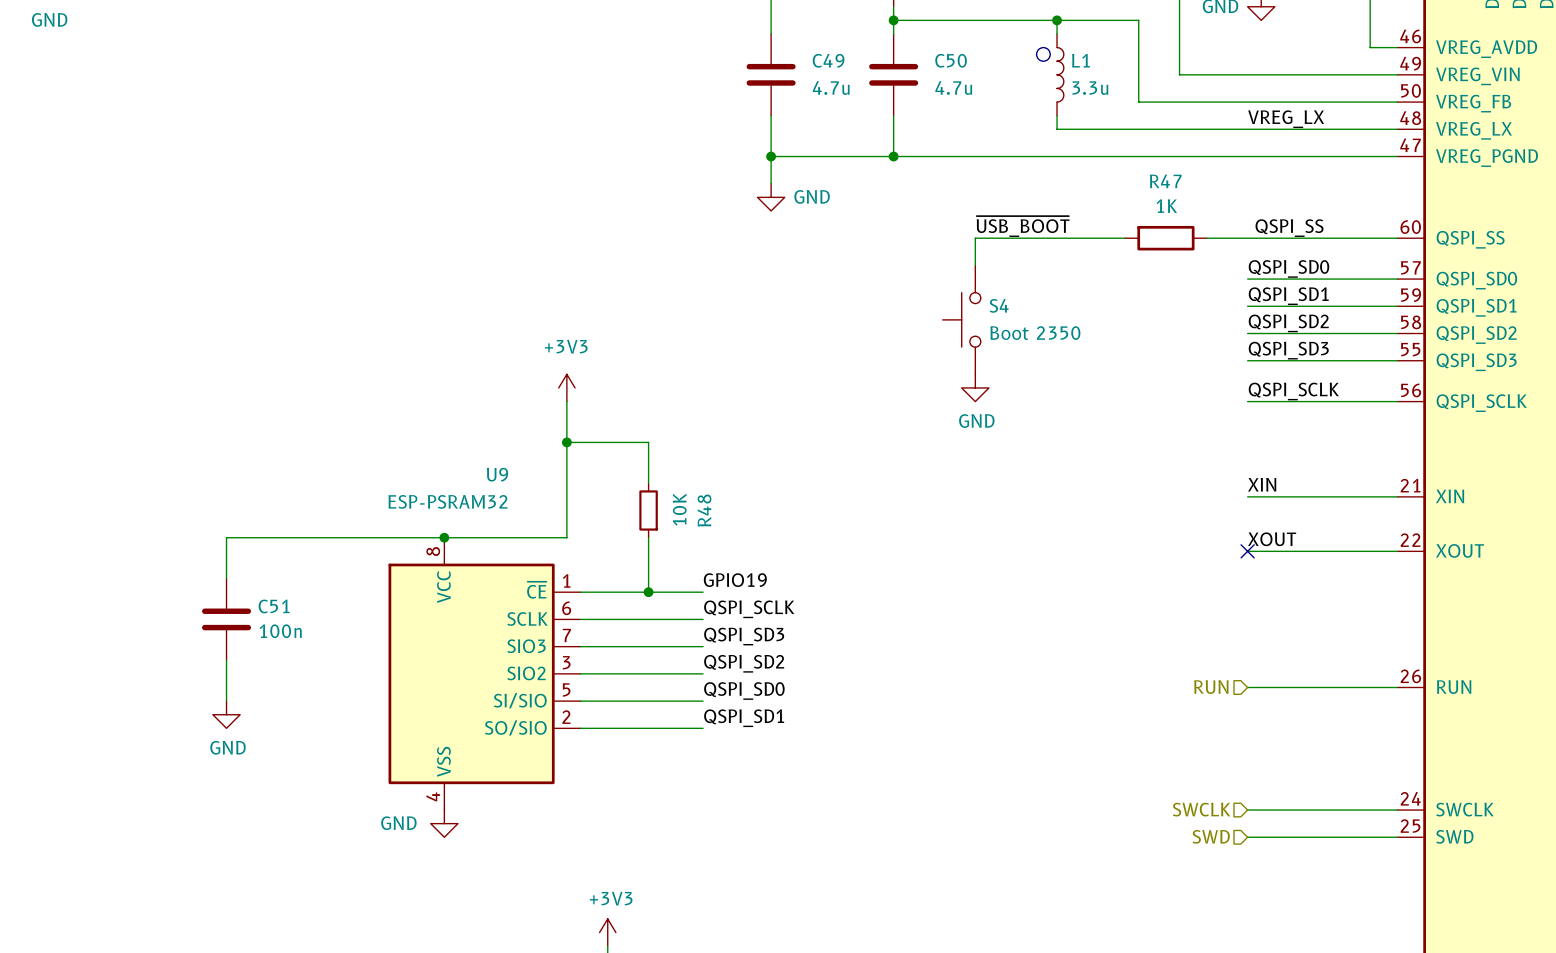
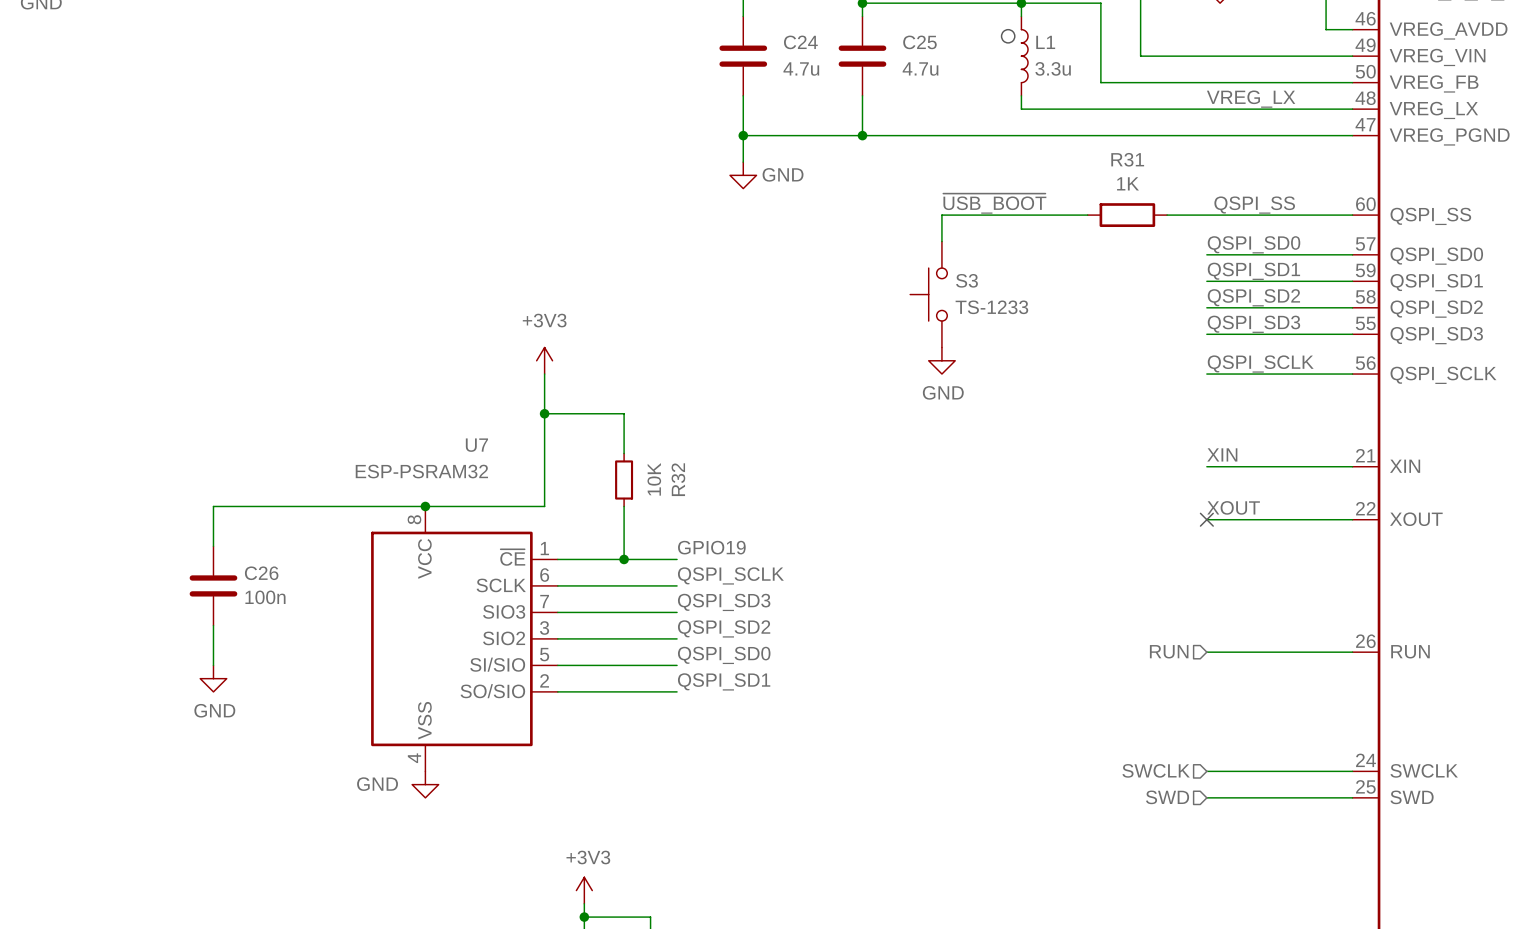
C49 name: C49 (828, 60) -> C24 (800, 42)
C50 name: C50 (951, 60) -> C25 (919, 42)
R47 name: R47 (1165, 181) -> R31 (1127, 159)
S4 name: S4 (999, 305) -> S3 (966, 280)
S4 value: Boot 2350 (1035, 333) -> TS-1233 (991, 307)
U9 name: U9 (497, 474) -> U7 (476, 445)
R48 name: R48 (704, 510) -> R32 (678, 479)
C51 name: C51 (274, 606) -> C26 (261, 573)

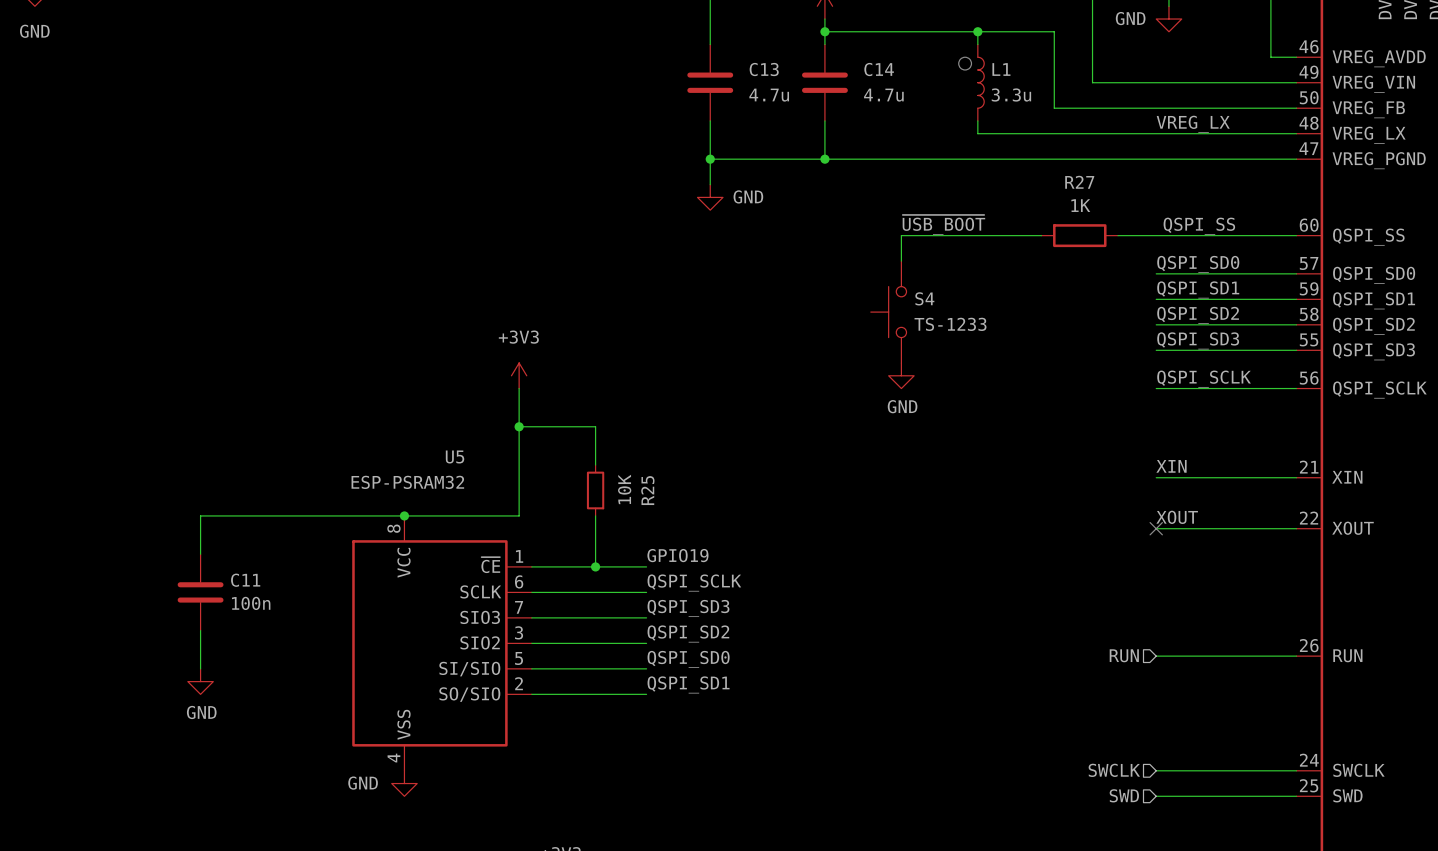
C24 name: C24 (800, 42) -> C13 (764, 69)
C25 name: C25 (919, 42) -> C14 (879, 69)
R31 name: R31 (1127, 159) -> R27 (1079, 182)
S3 name: S3 (966, 280) -> S4 (924, 298)
U7 name: U7 (476, 445) -> U5 (455, 456)
R32 name: R32 (678, 479) -> R25 (647, 490)
C26 name: C26 (261, 573) -> C11 (245, 580)

